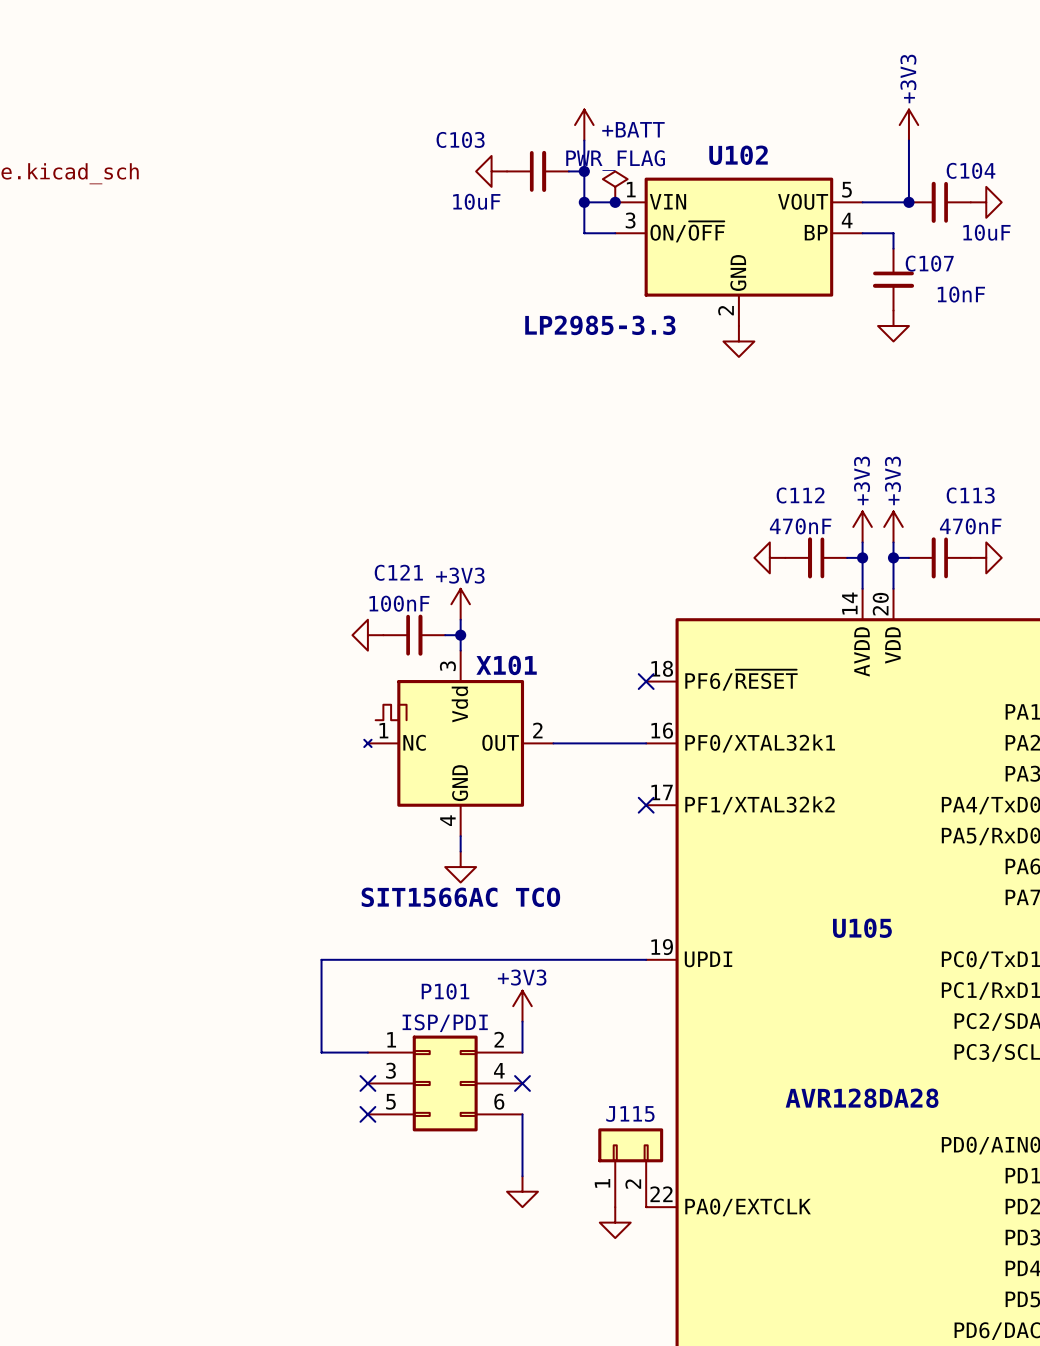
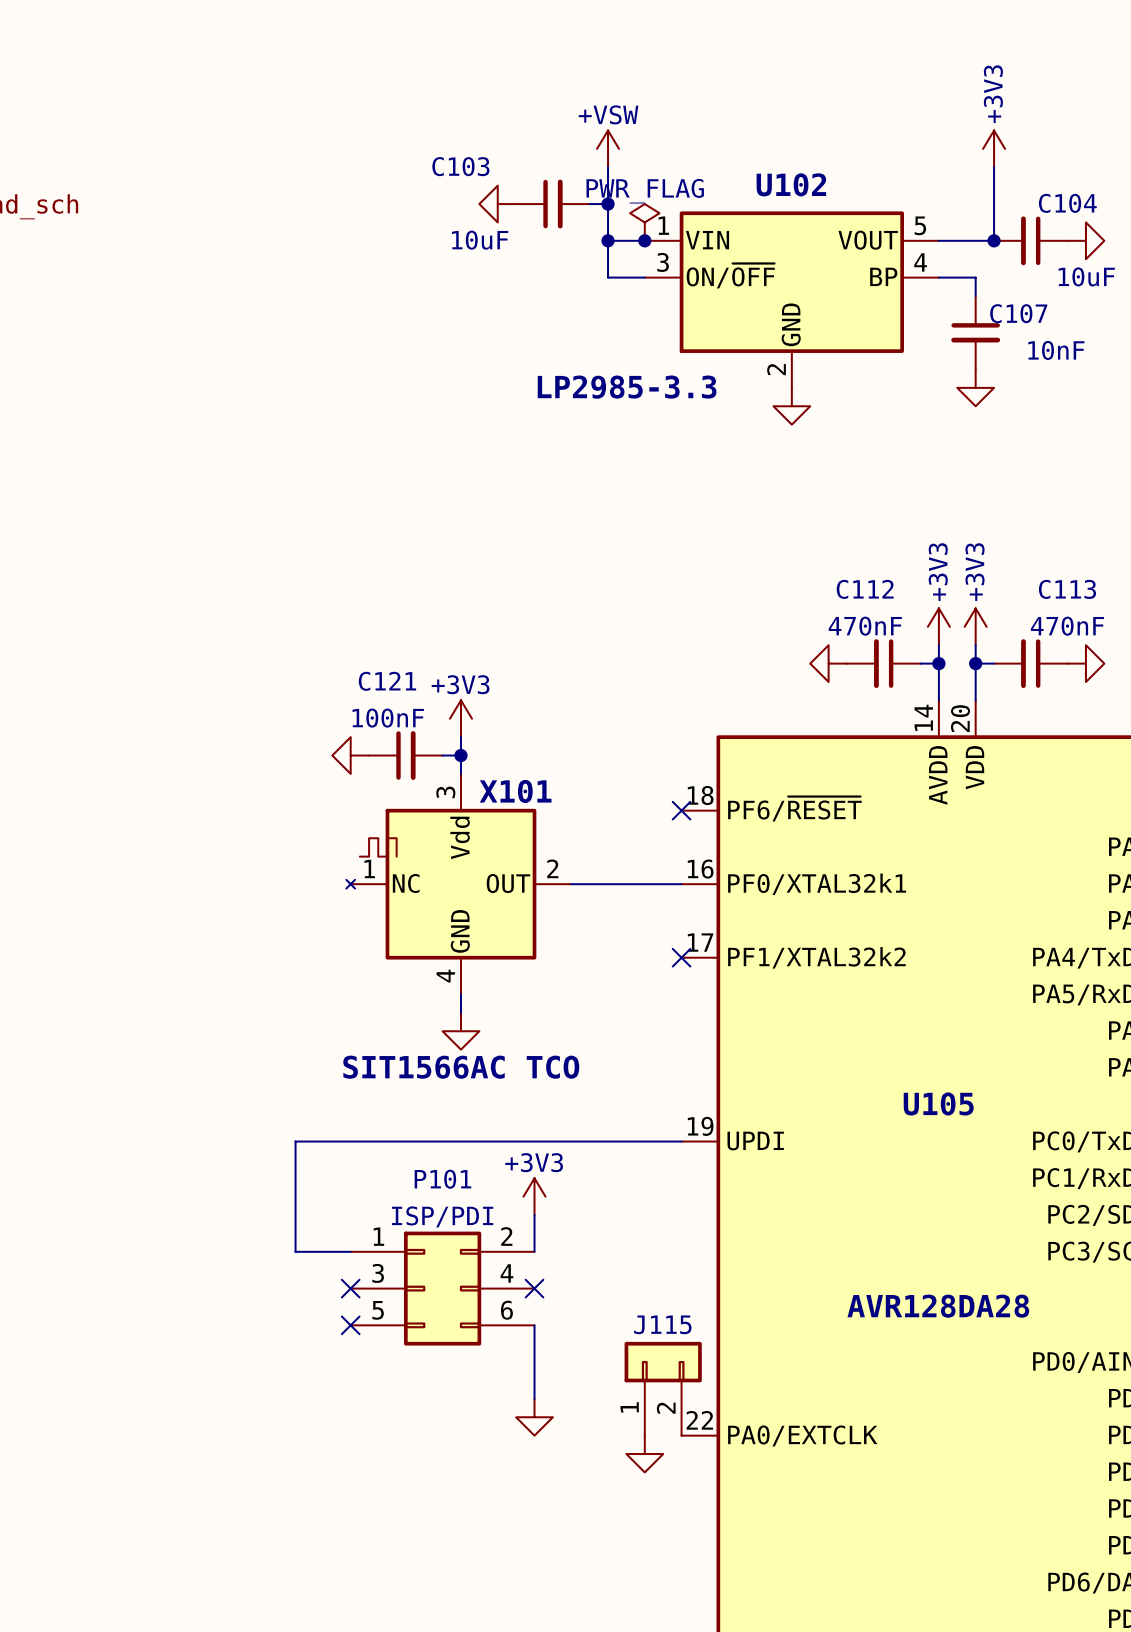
power symbol: +BATT (584, 125) -> +VSW (608, 148)

